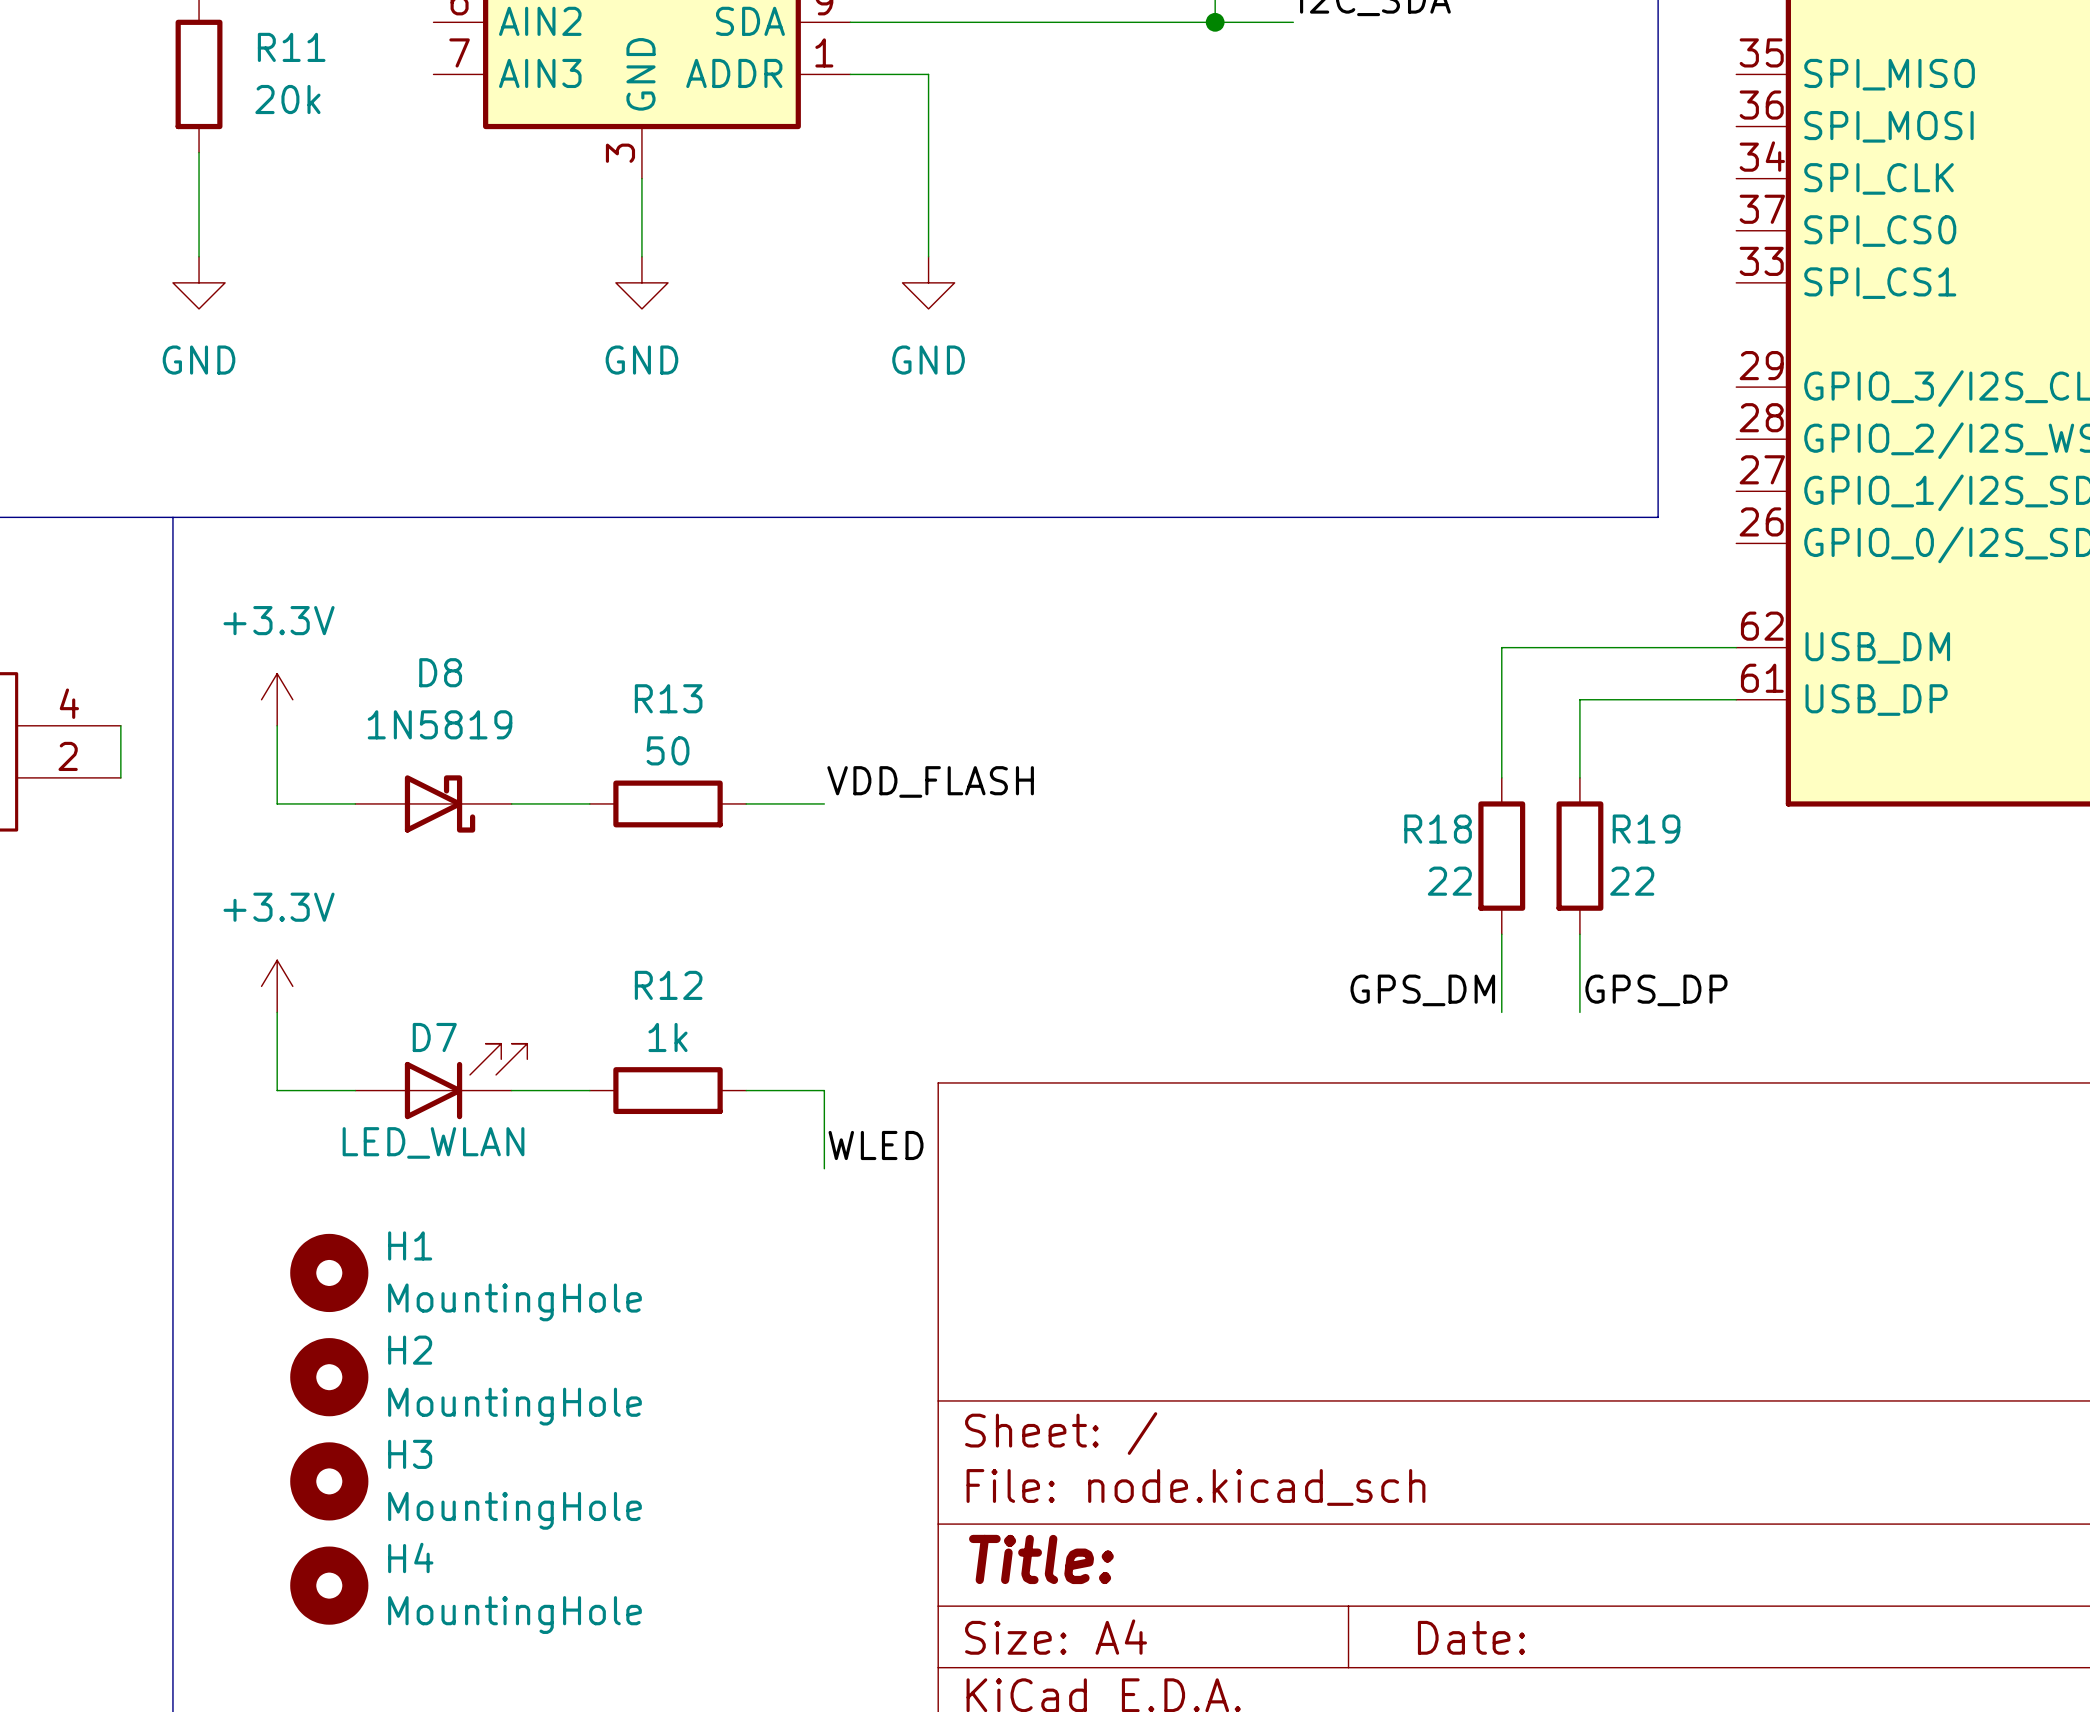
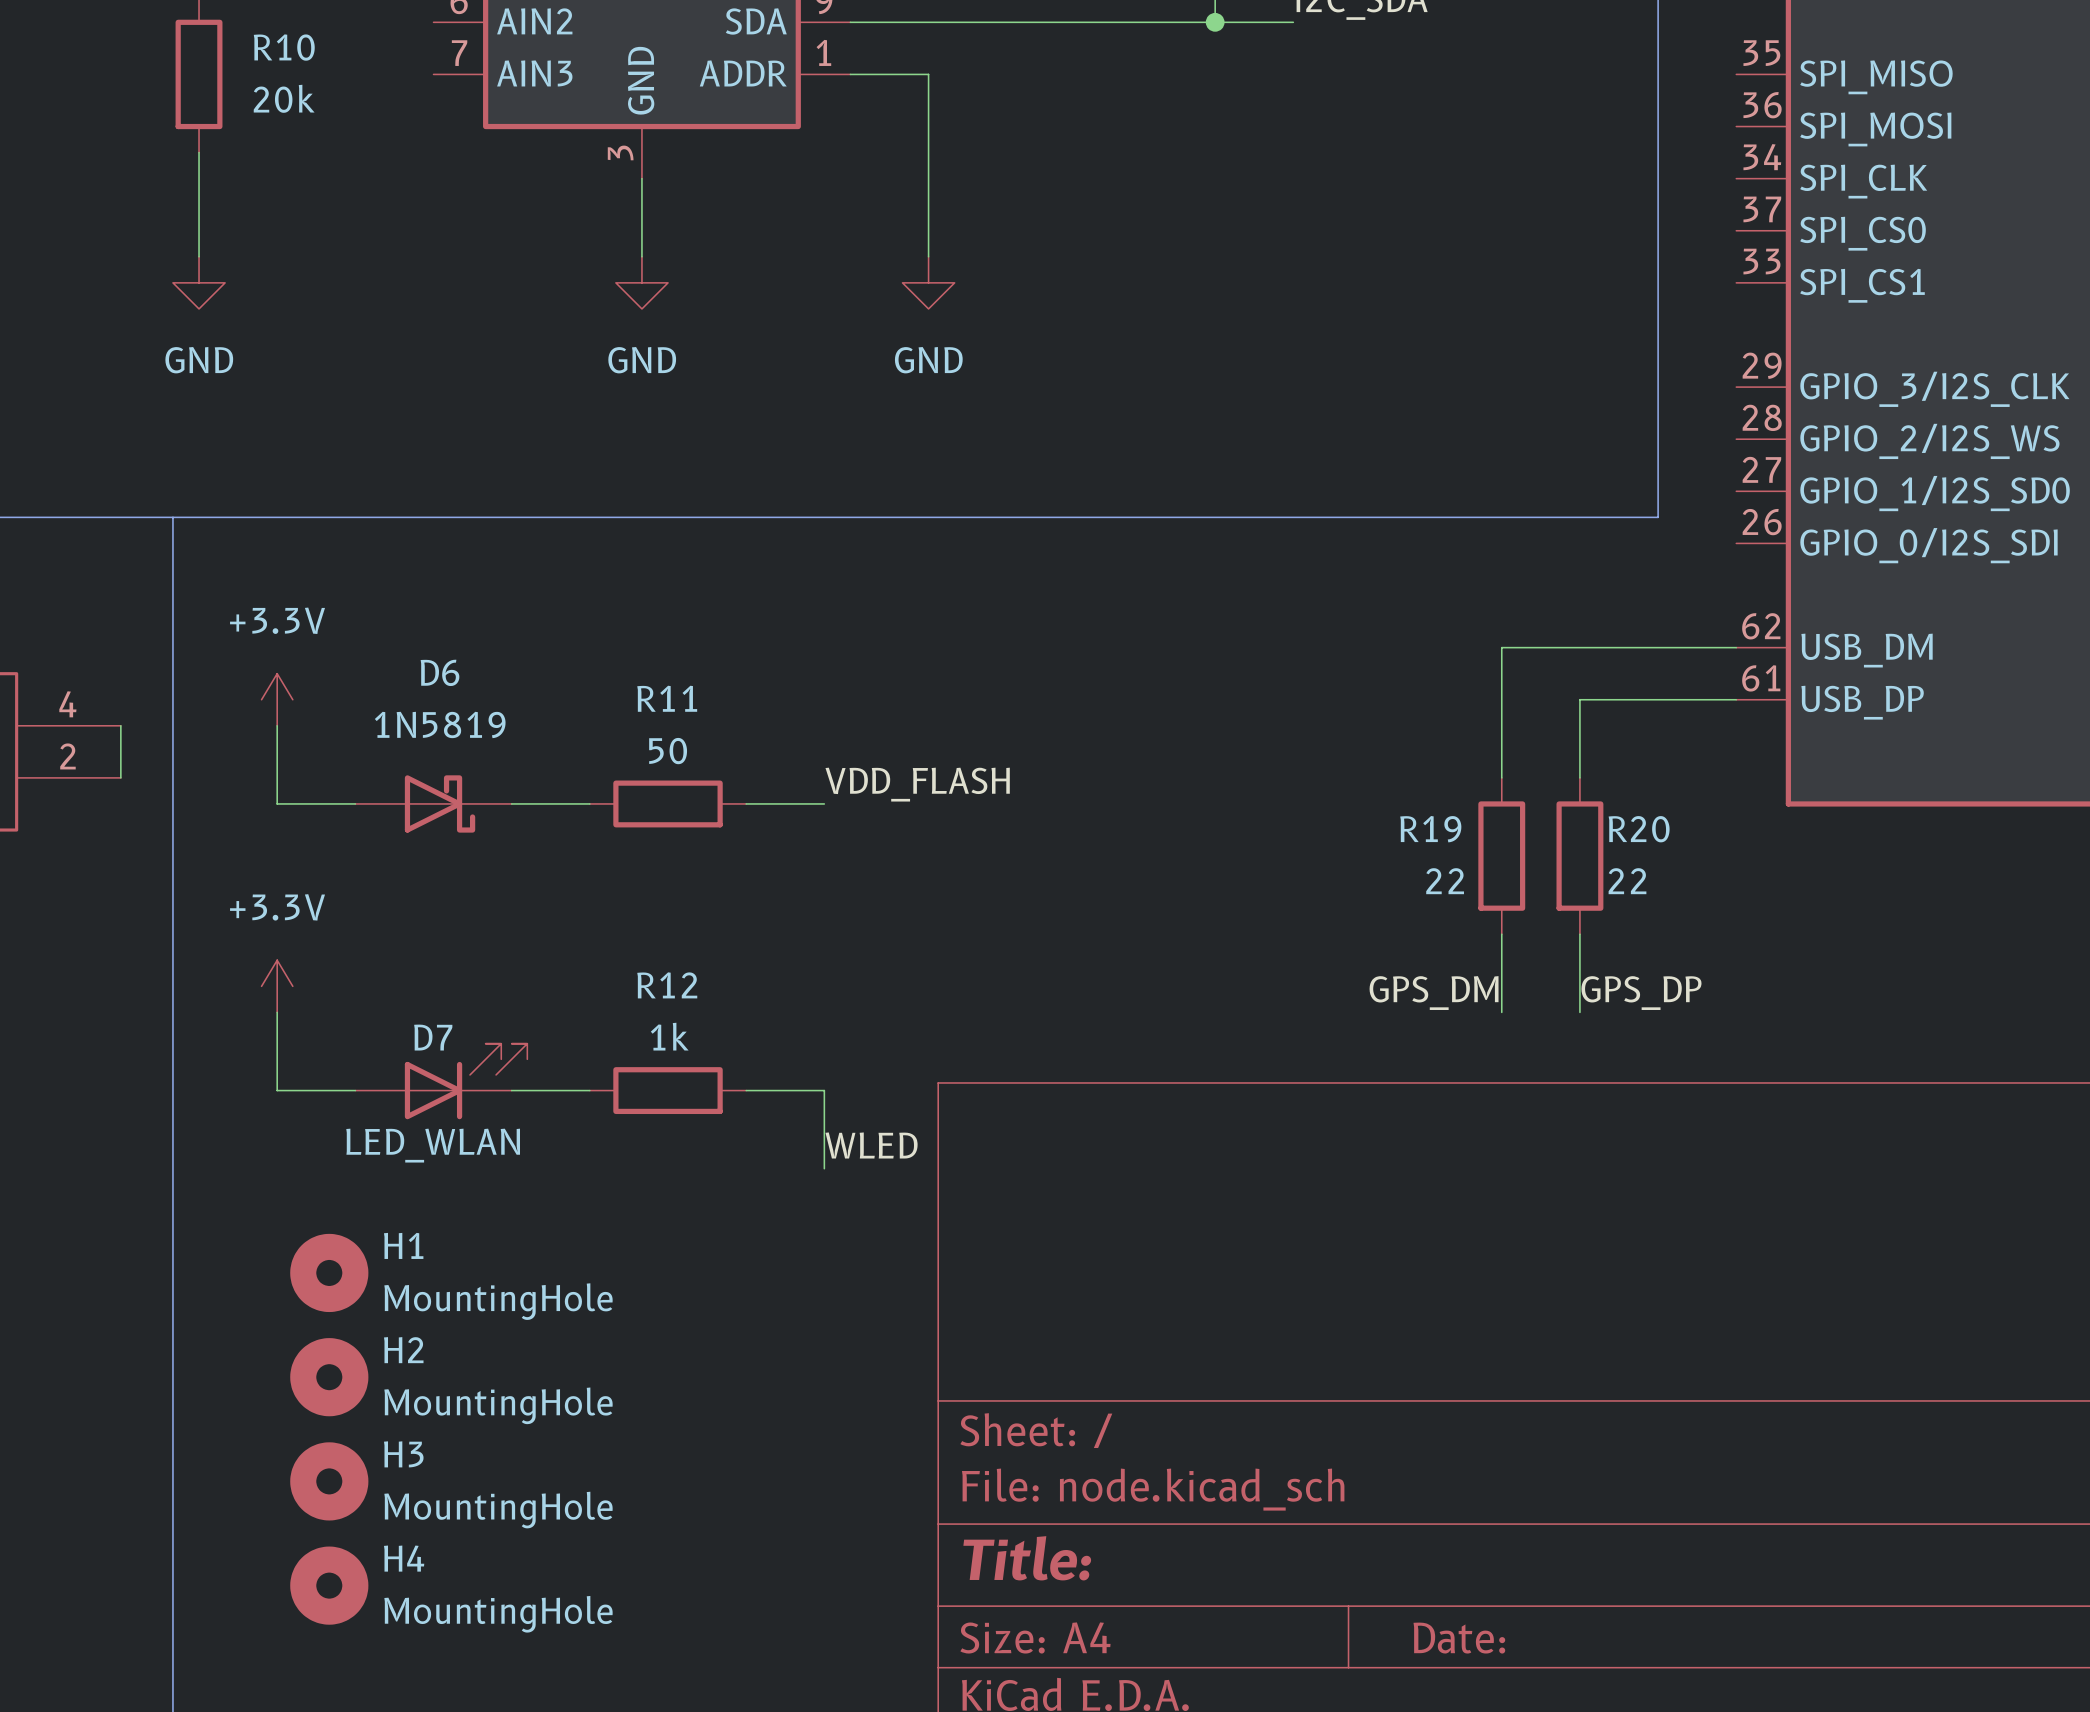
R11 name: R11 (291, 47) -> R10 (284, 47)
D8 name: D8 (440, 672) -> D6 (440, 672)
R13 name: R13 (668, 698) -> R11 (667, 698)
R18 name: R18 (1438, 829) -> R19 (1430, 829)
R19 name: R19 (1646, 829) -> R20 (1639, 829)

